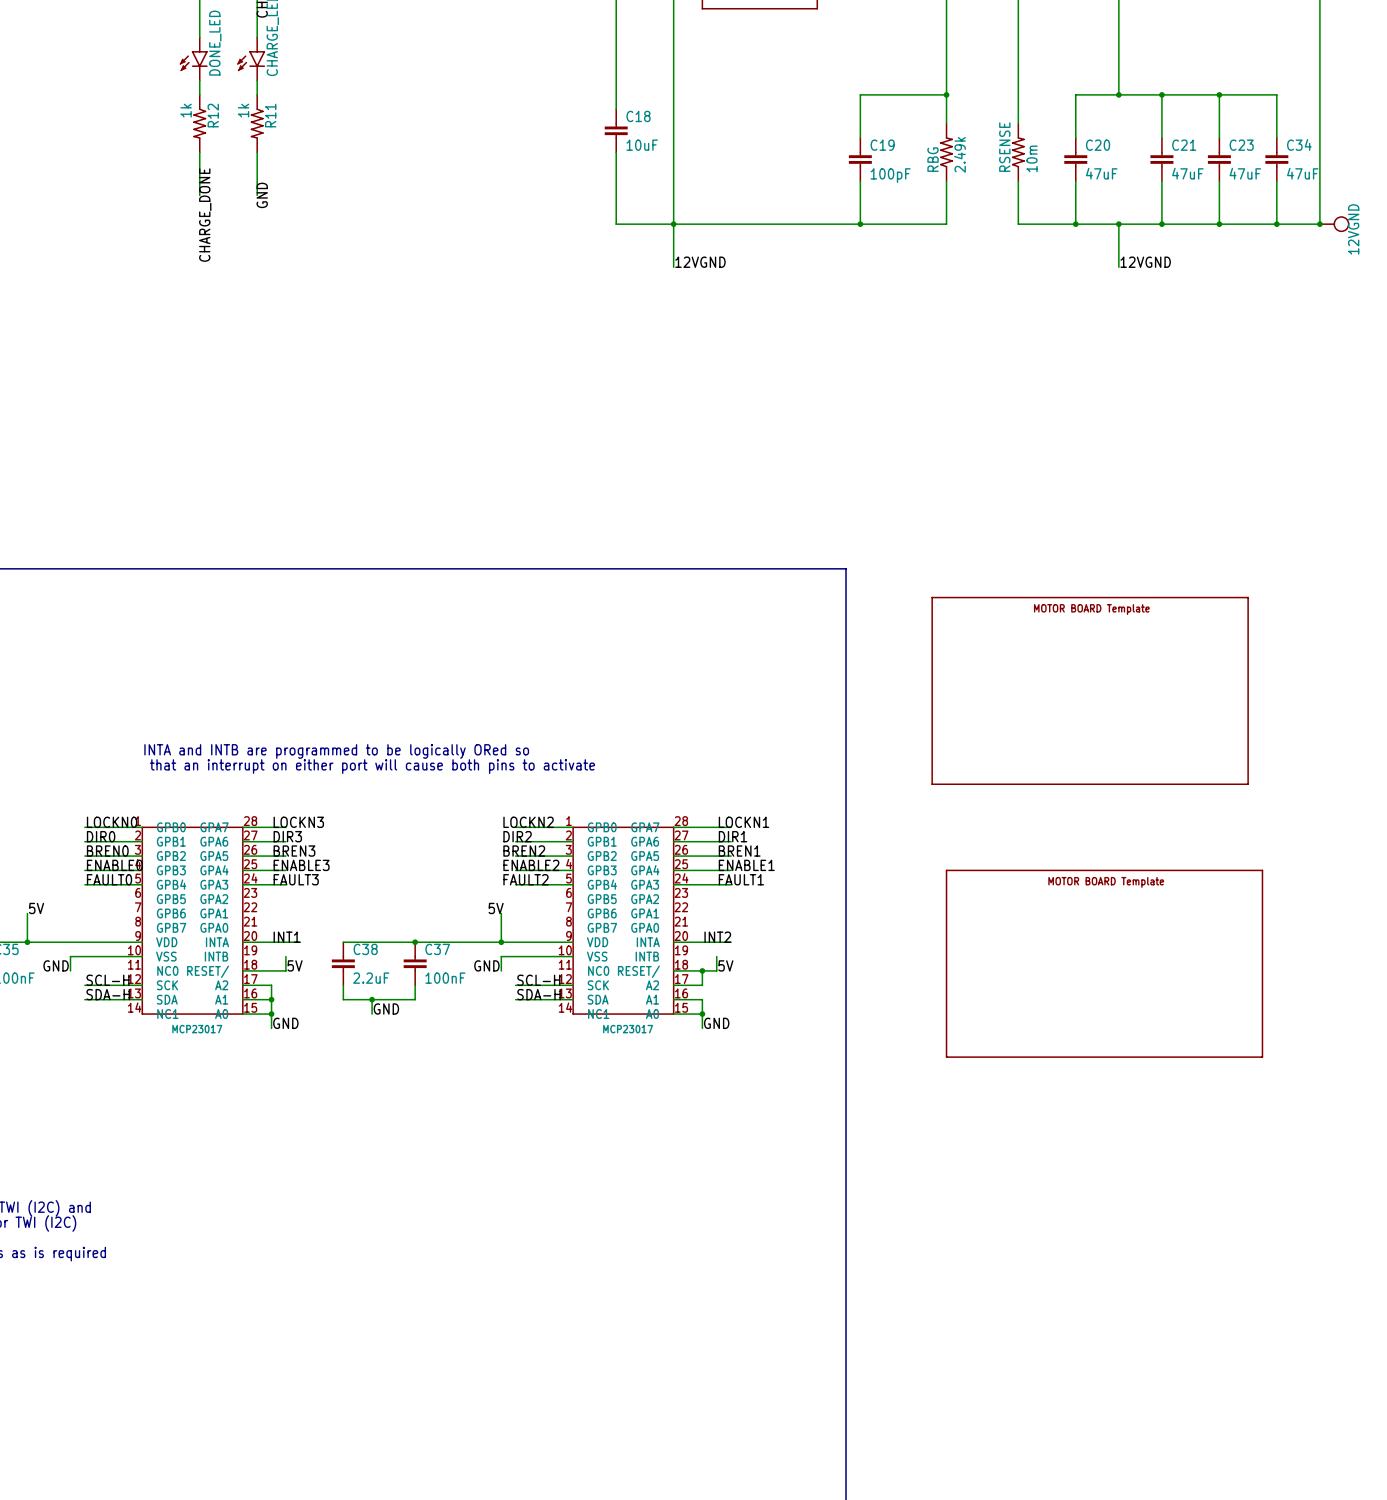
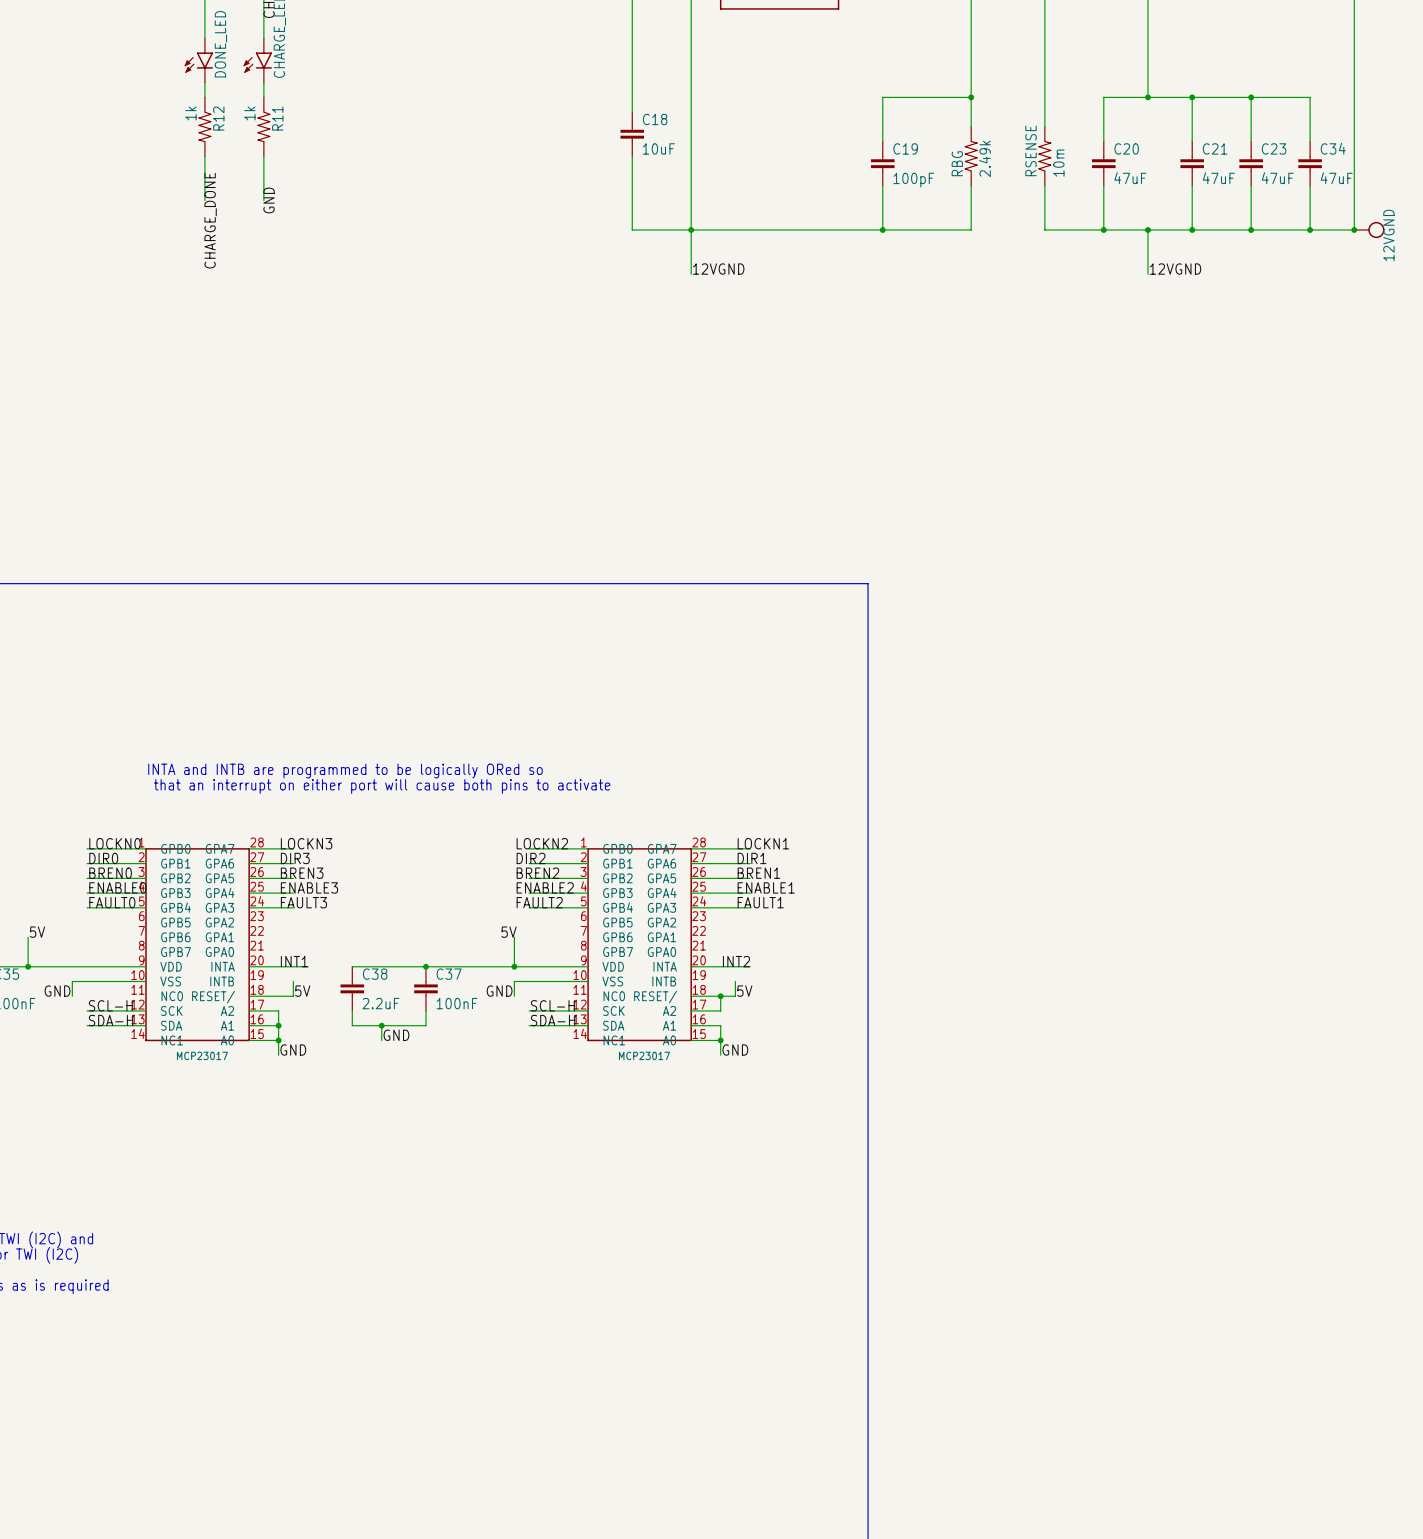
part: (1090, 690) -> none
part: (1104, 963) -> none

